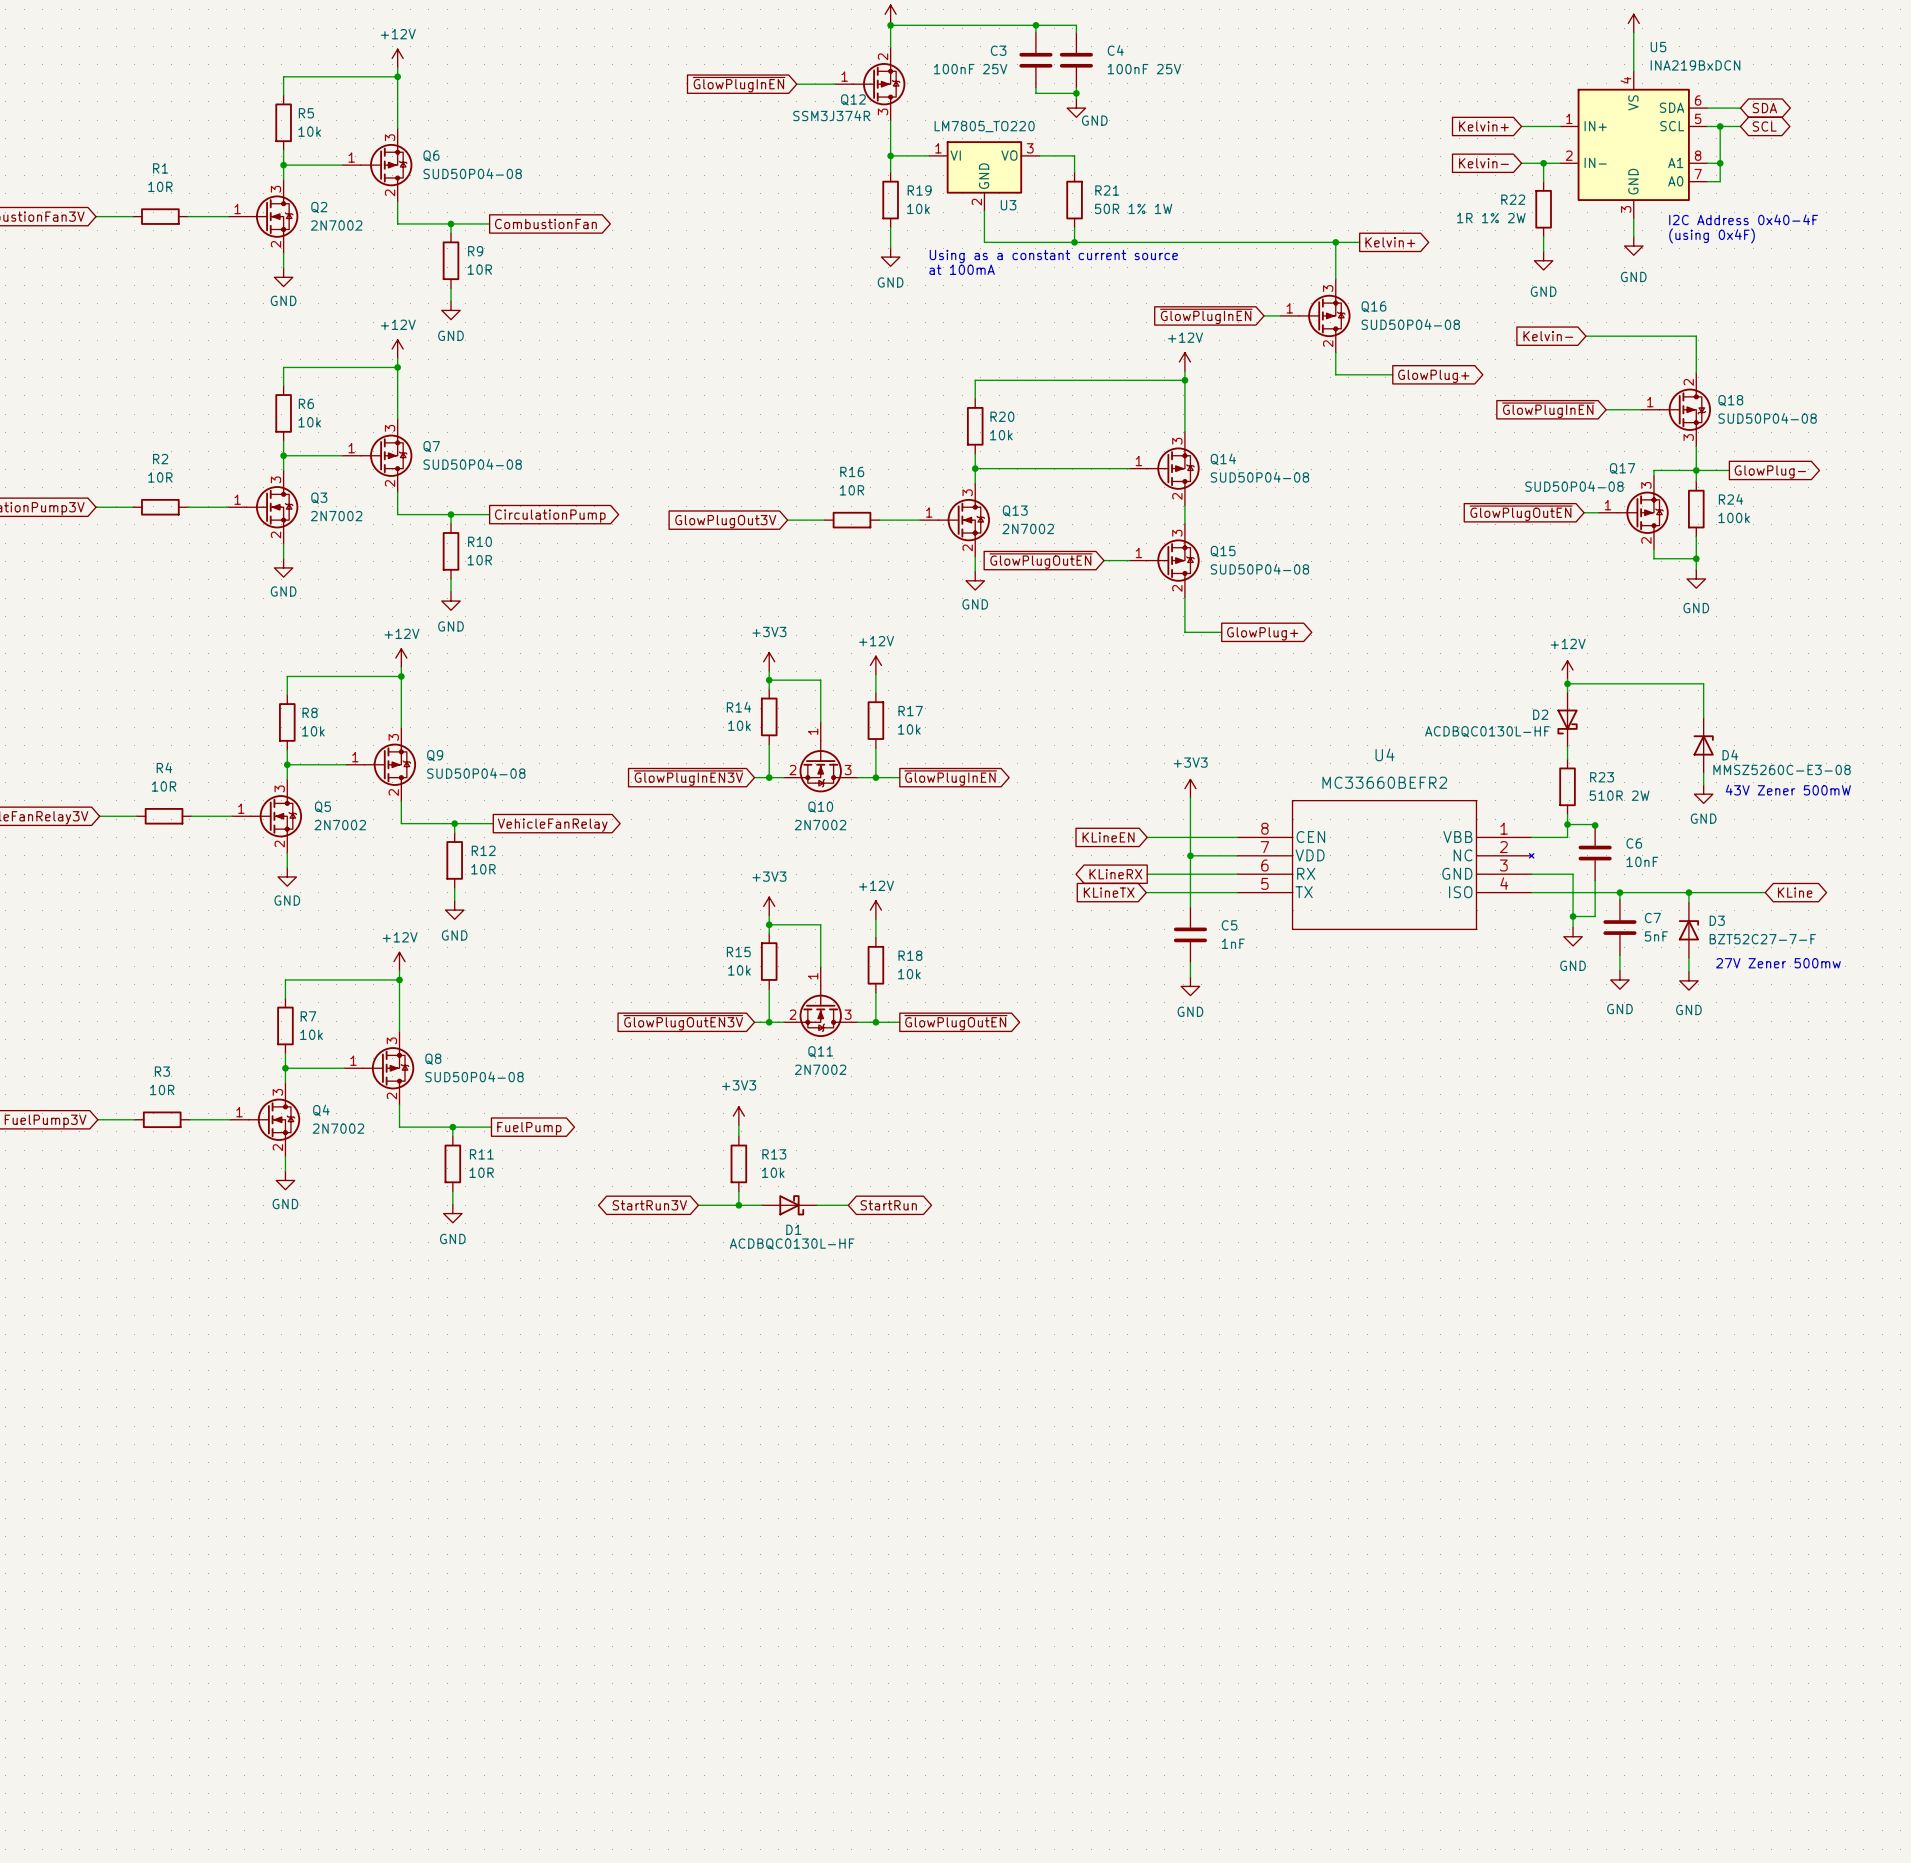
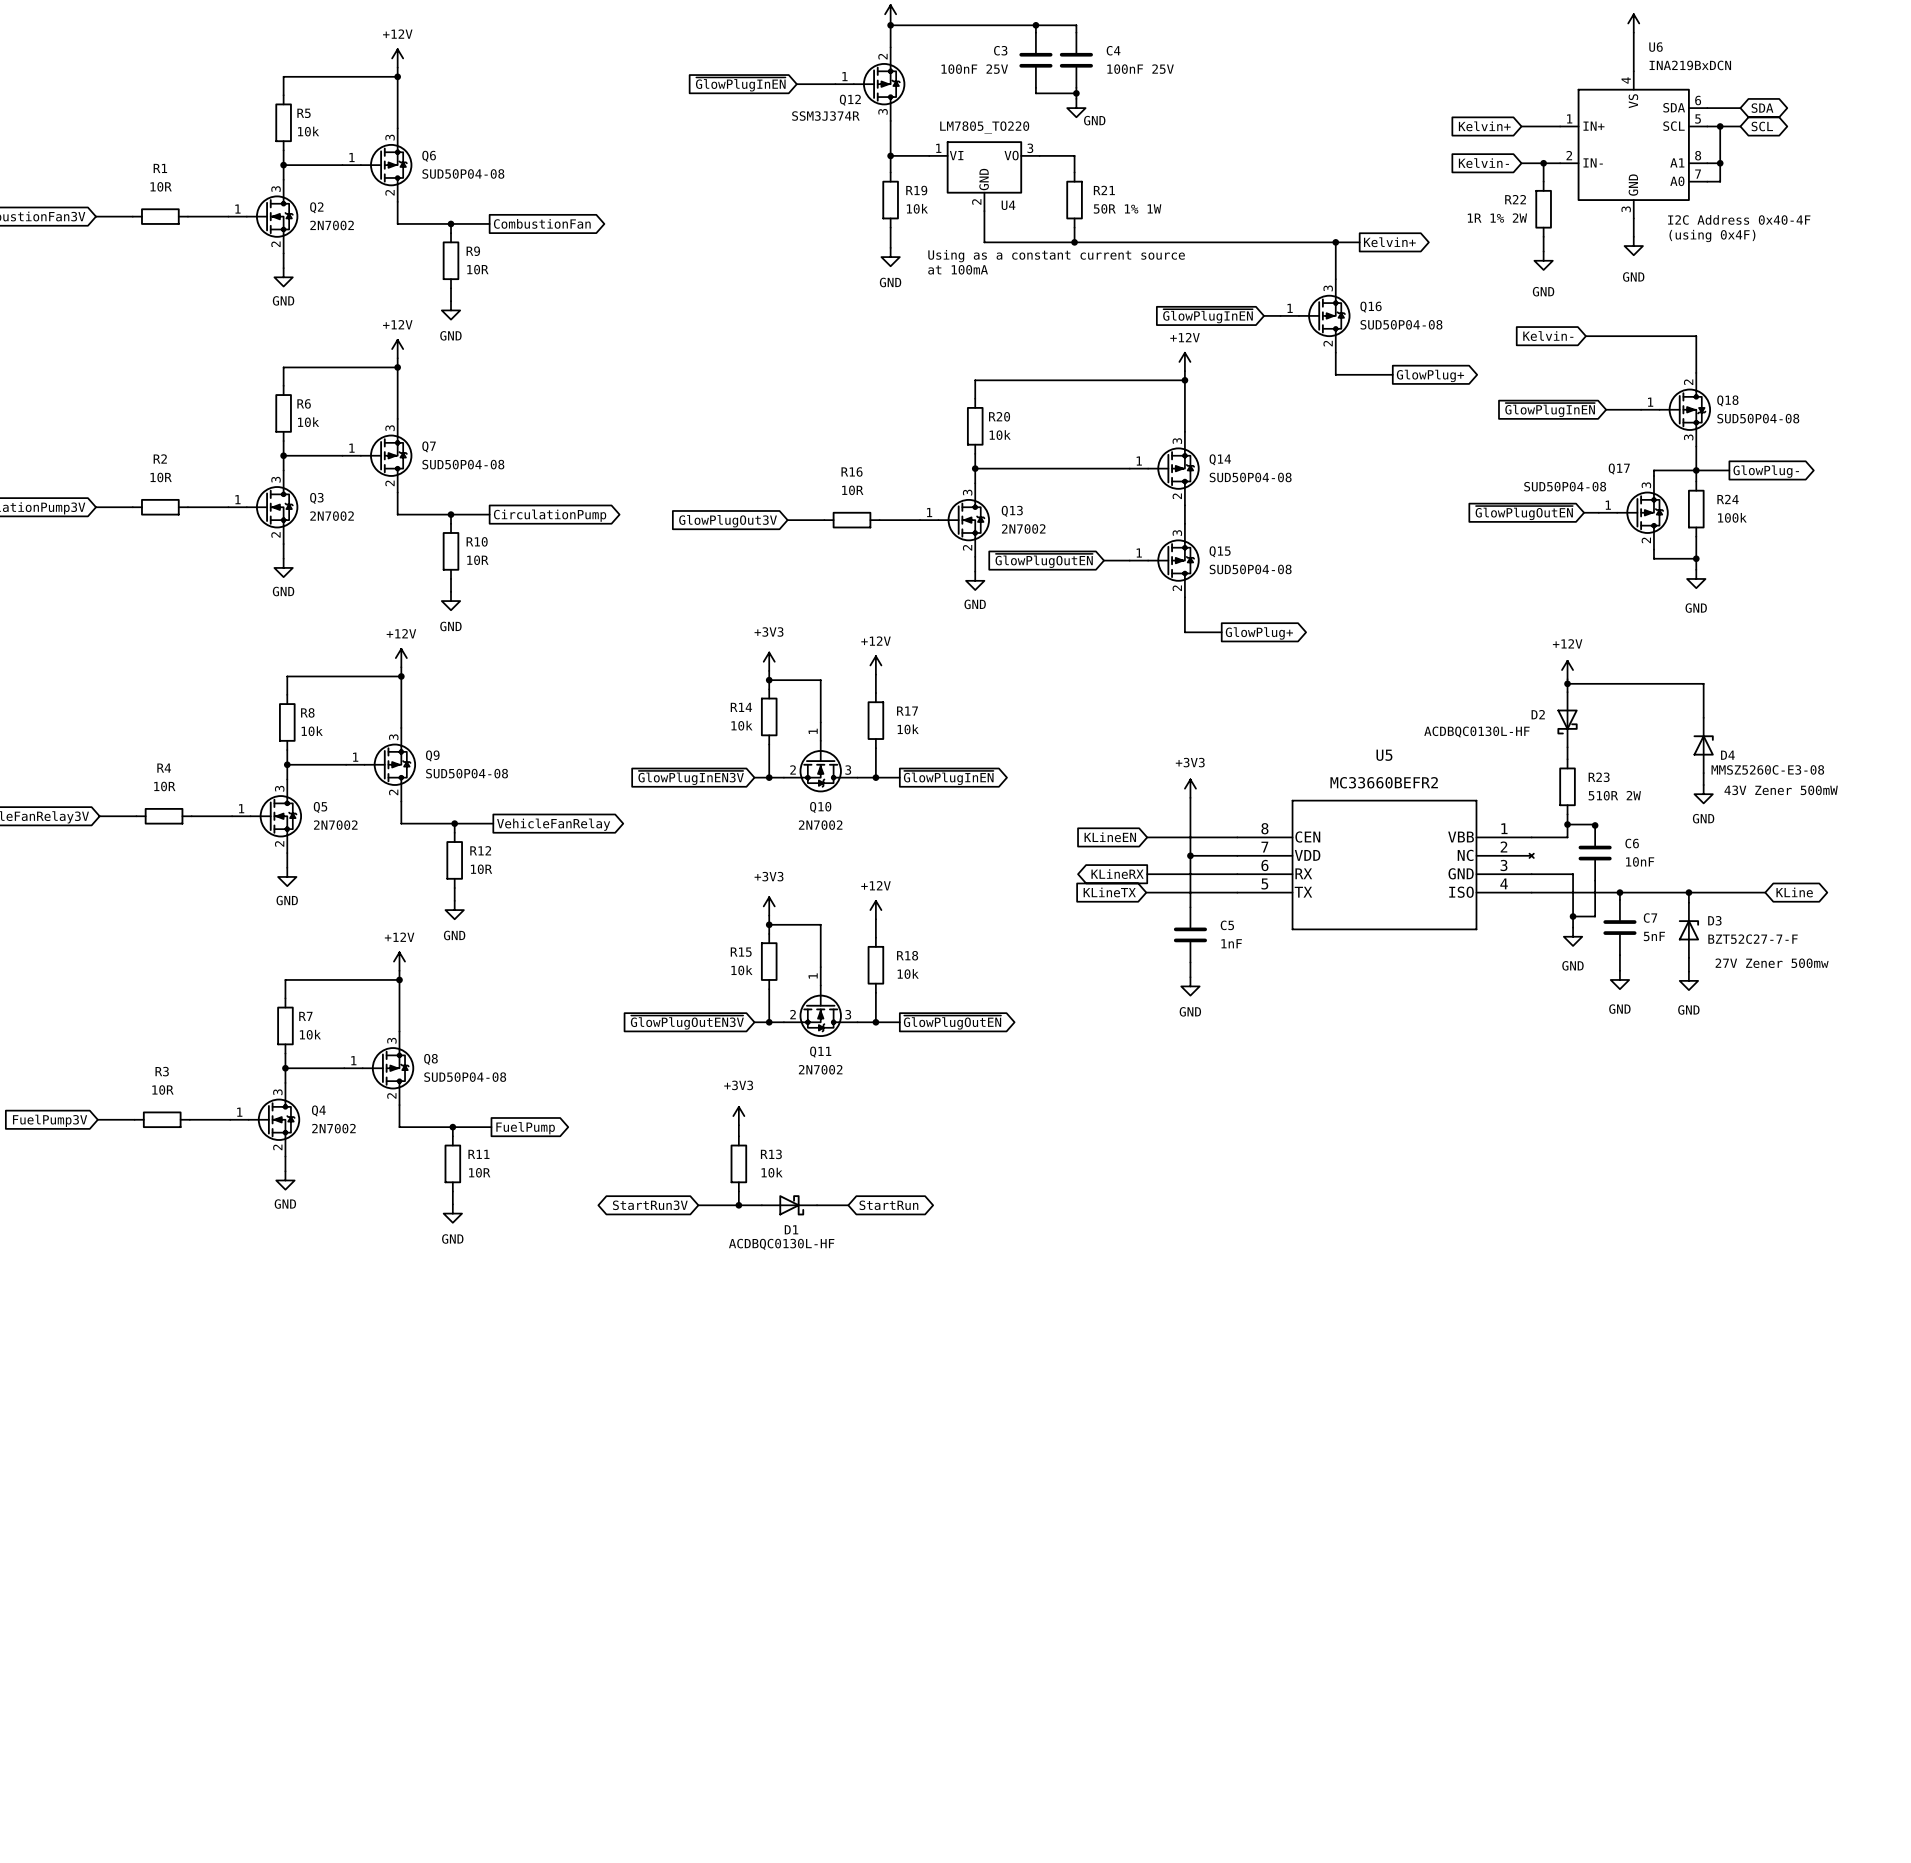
U5 name: U5 (1658, 47) -> U6 (1656, 47)
U3 name: U3 (1008, 205) -> U4 (1008, 205)
U4 name: U4 (1385, 754) -> U5 (1384, 755)

